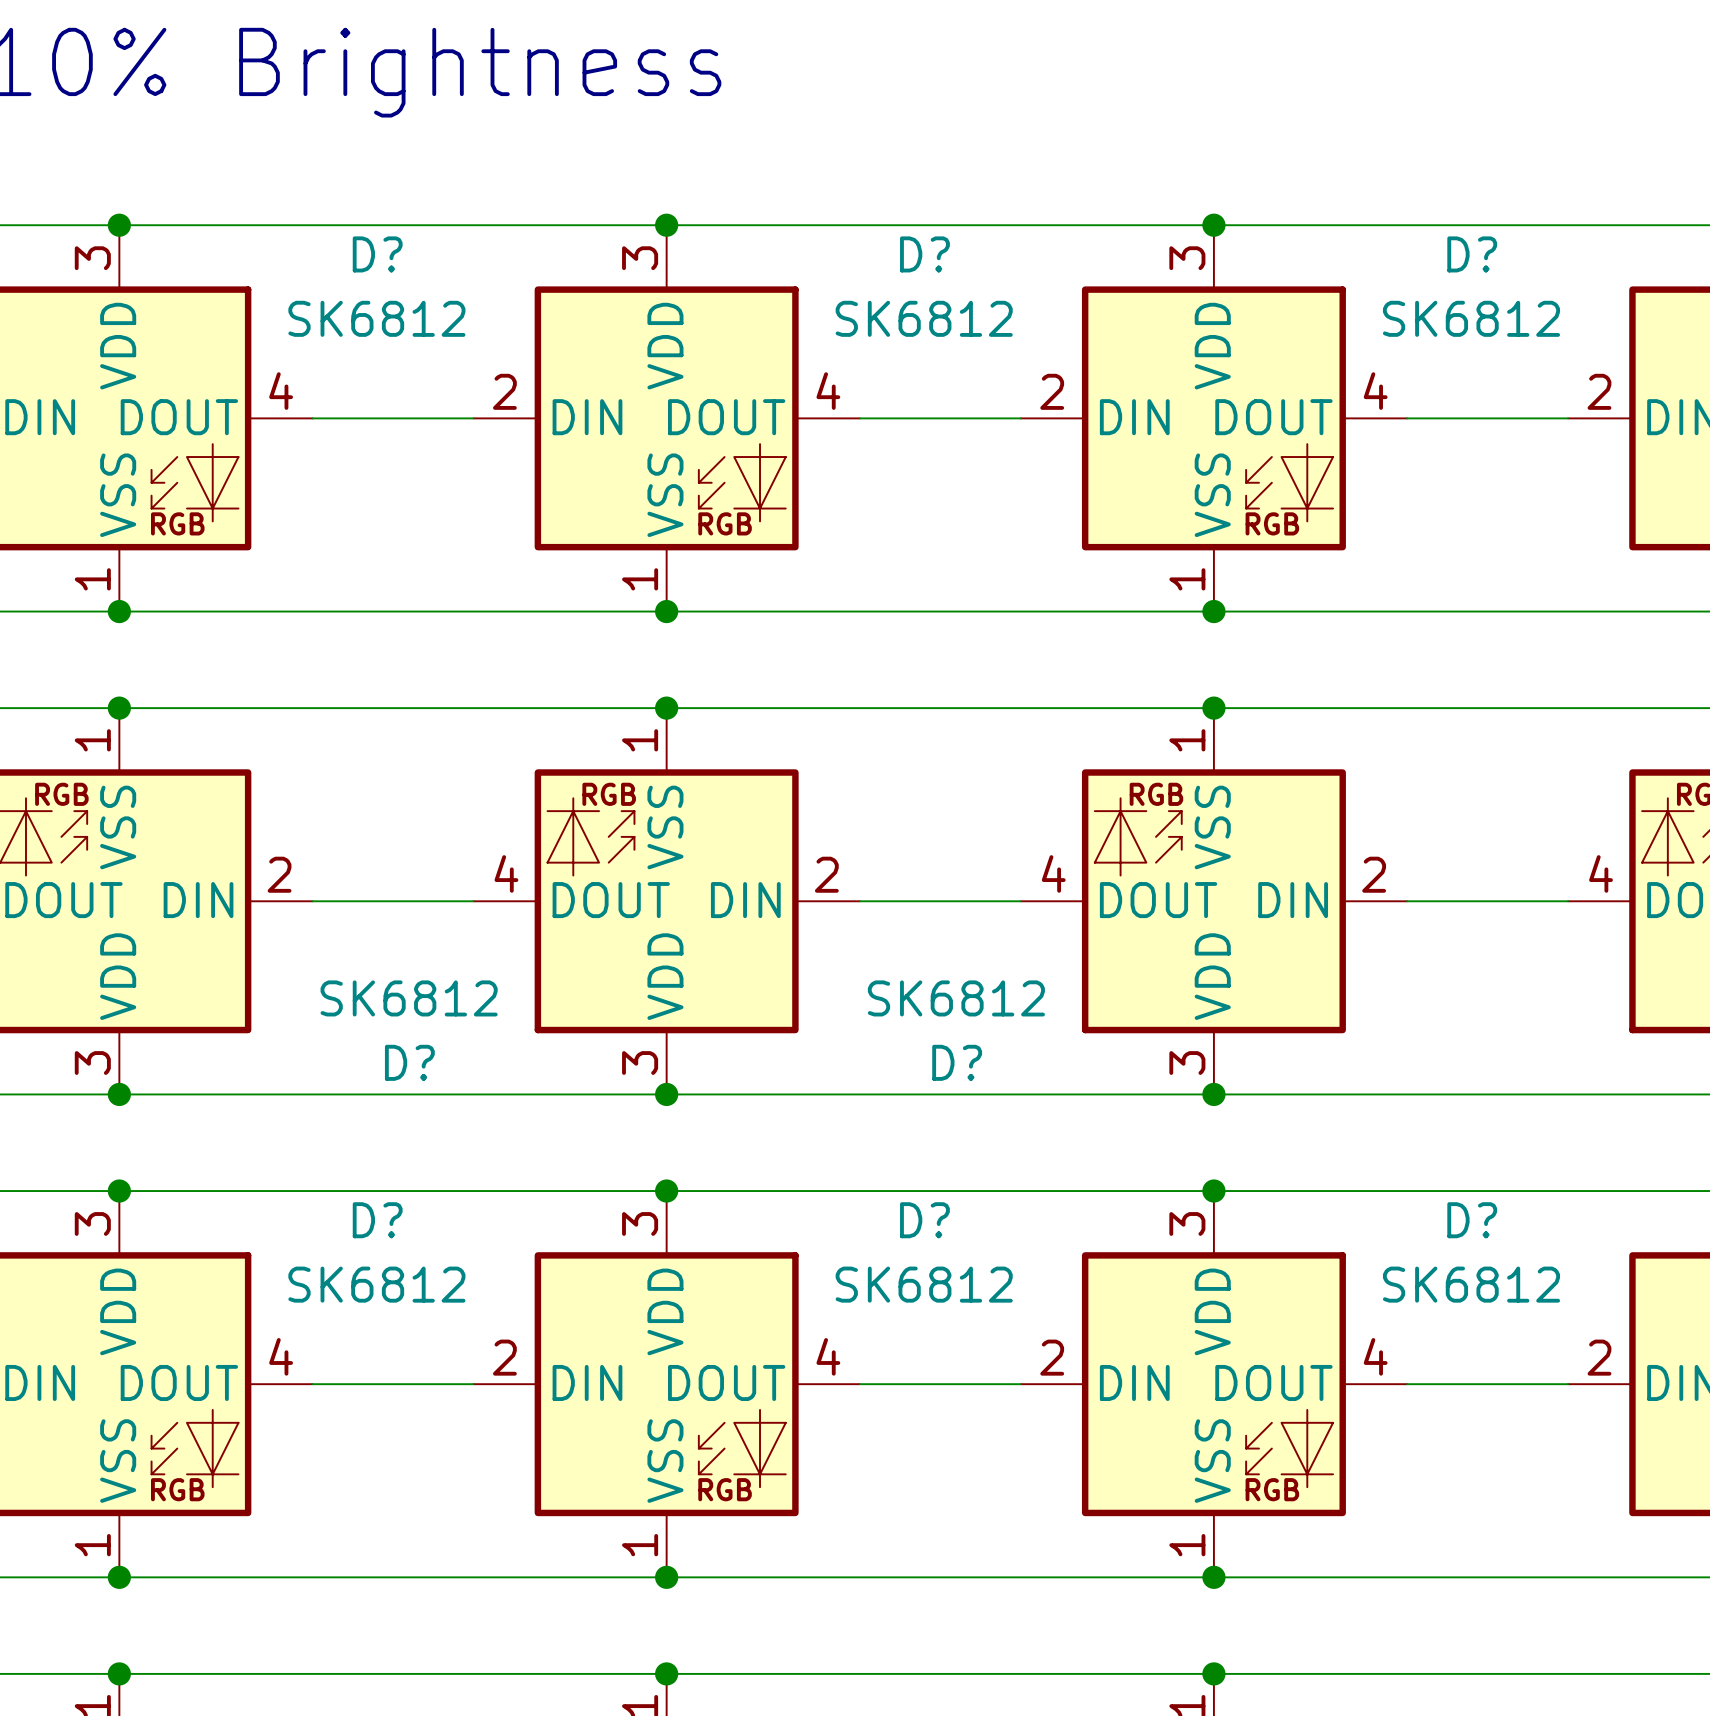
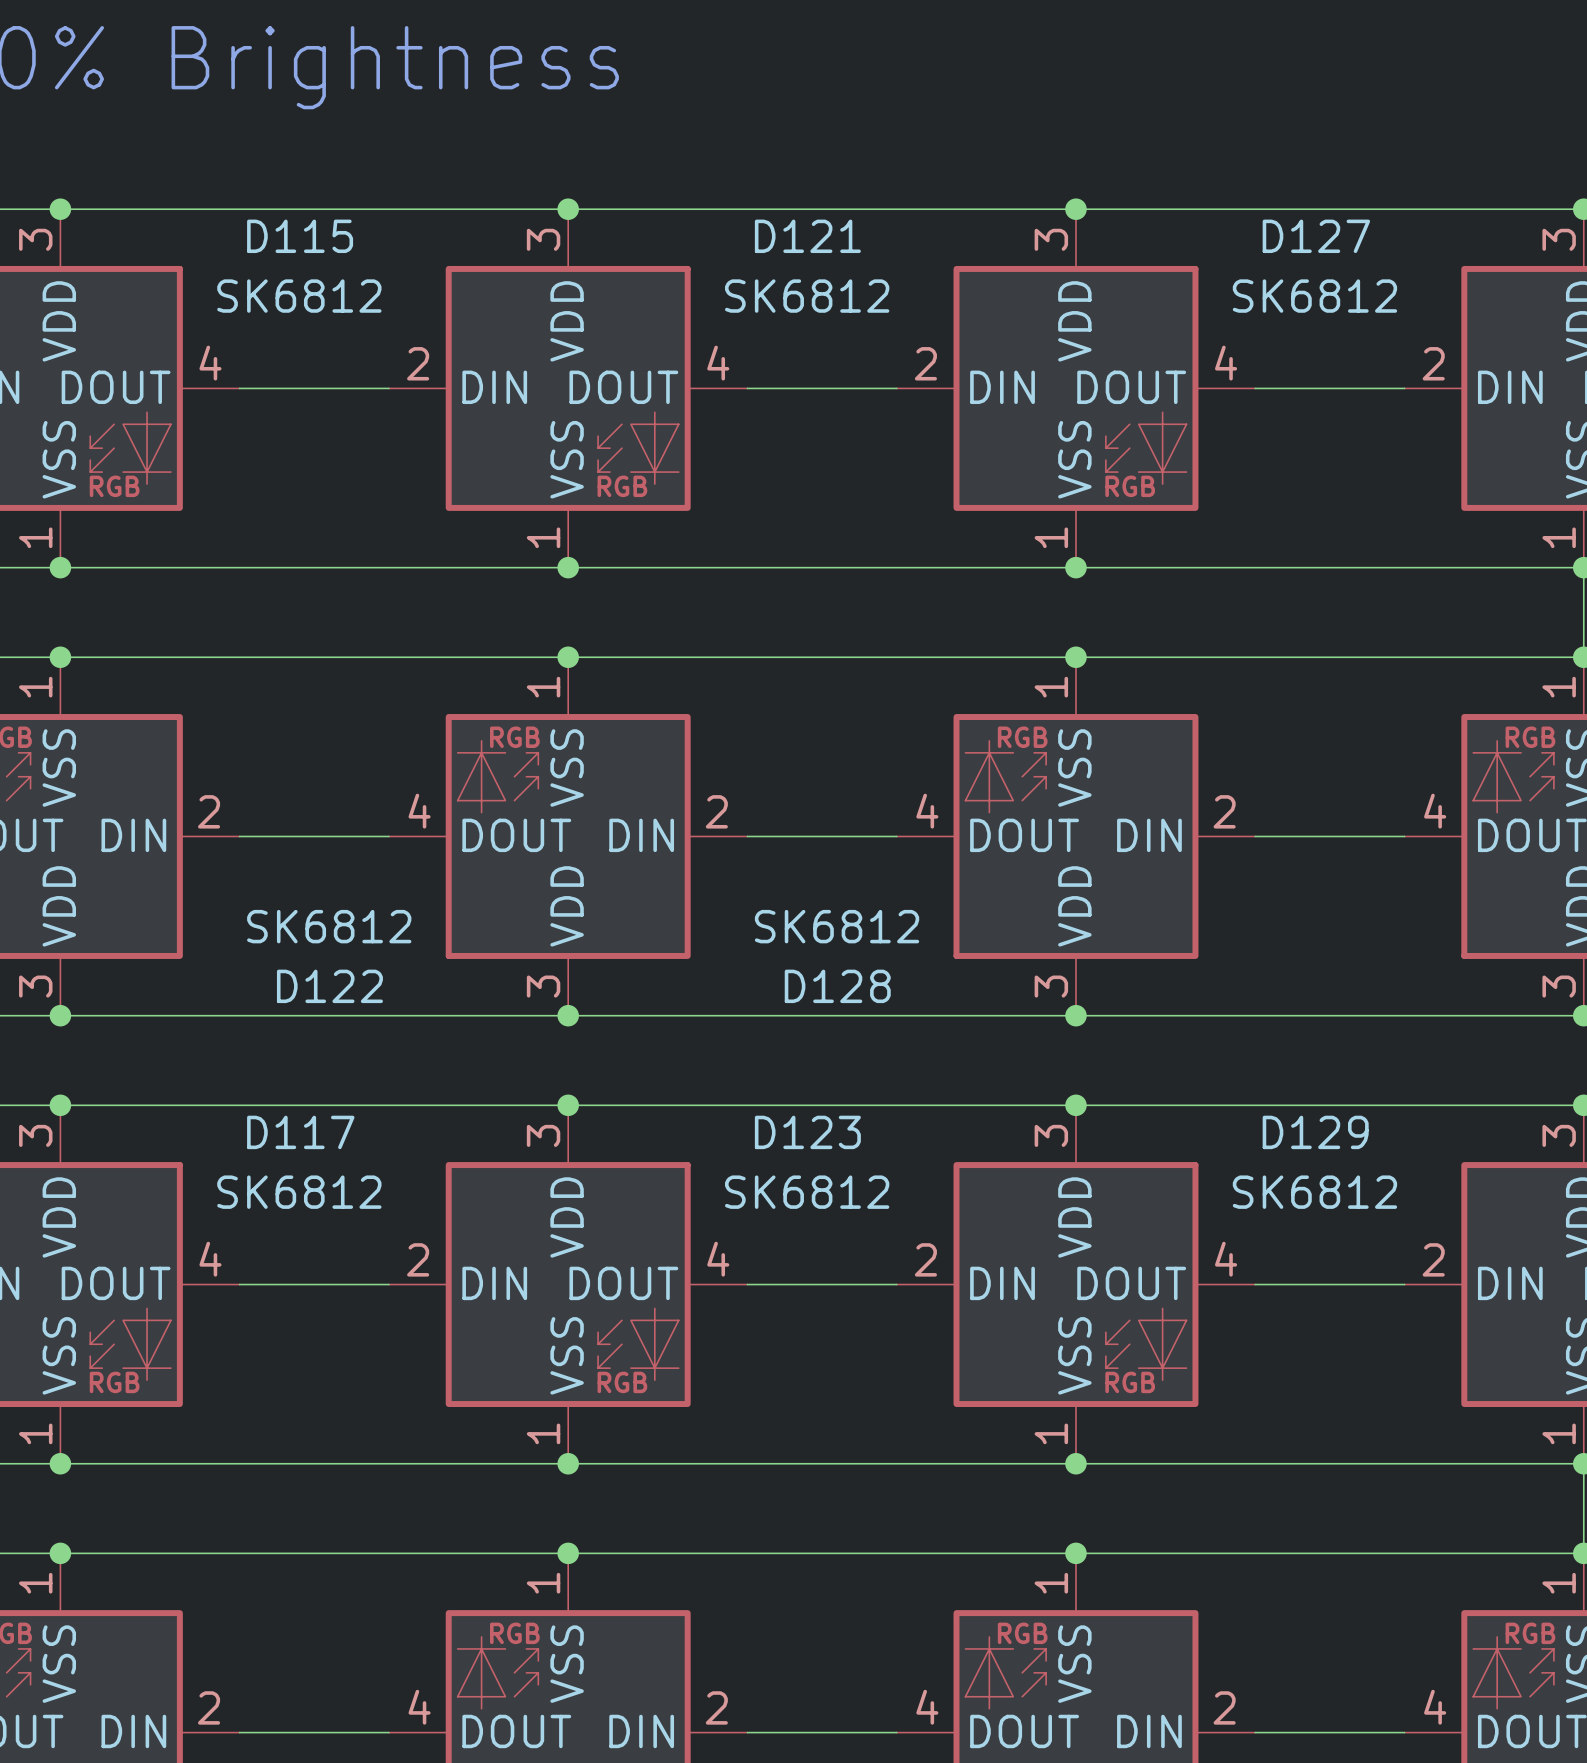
D? name: D? (377, 254) -> D115 (300, 236)
D? name: D? (924, 254) -> D121 (807, 236)
D? name: D? (1472, 254) -> D127 (1316, 236)
D? name: D? (409, 1062) -> D122 (329, 986)
D? name: D? (957, 1062) -> D128 (837, 986)
D? name: D? (377, 1220) -> D117 (300, 1132)
D? name: D? (924, 1220) -> D123 (807, 1132)
D? name: D? (1472, 1220) -> D129 (1315, 1132)

